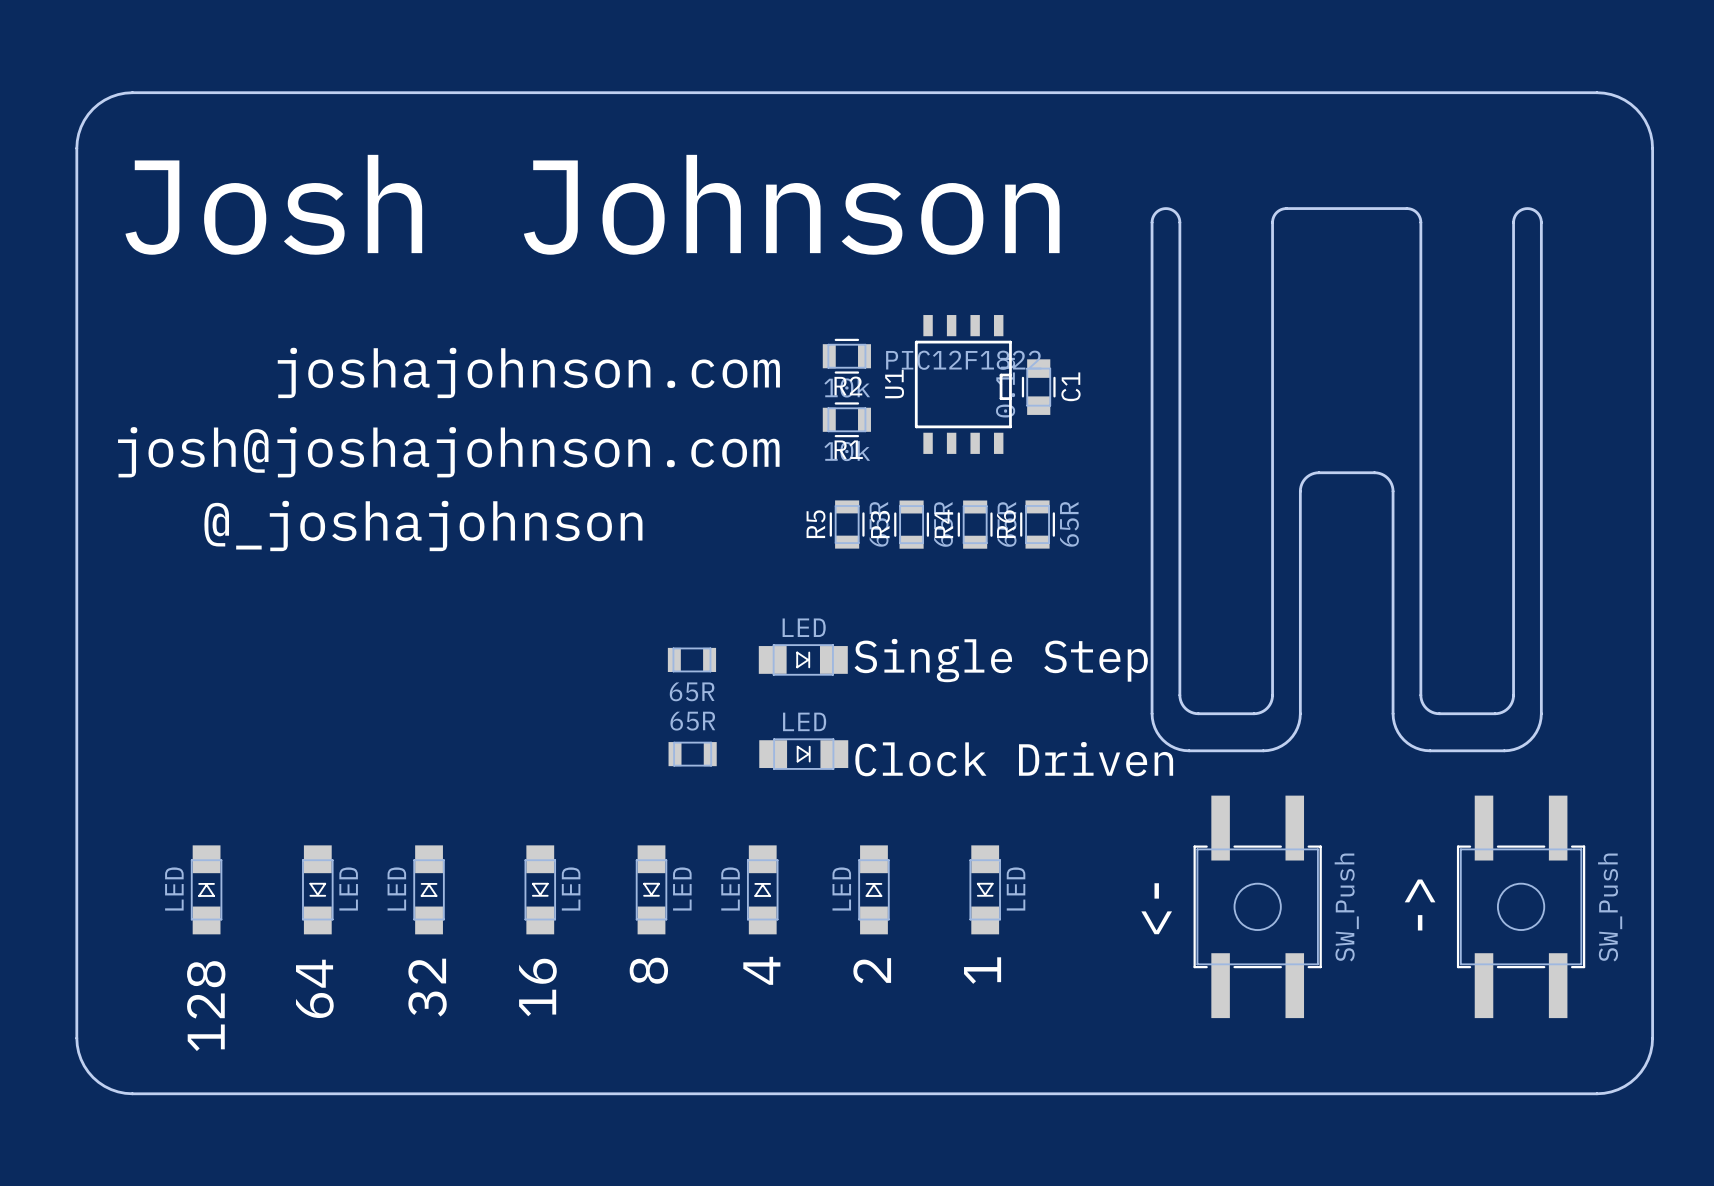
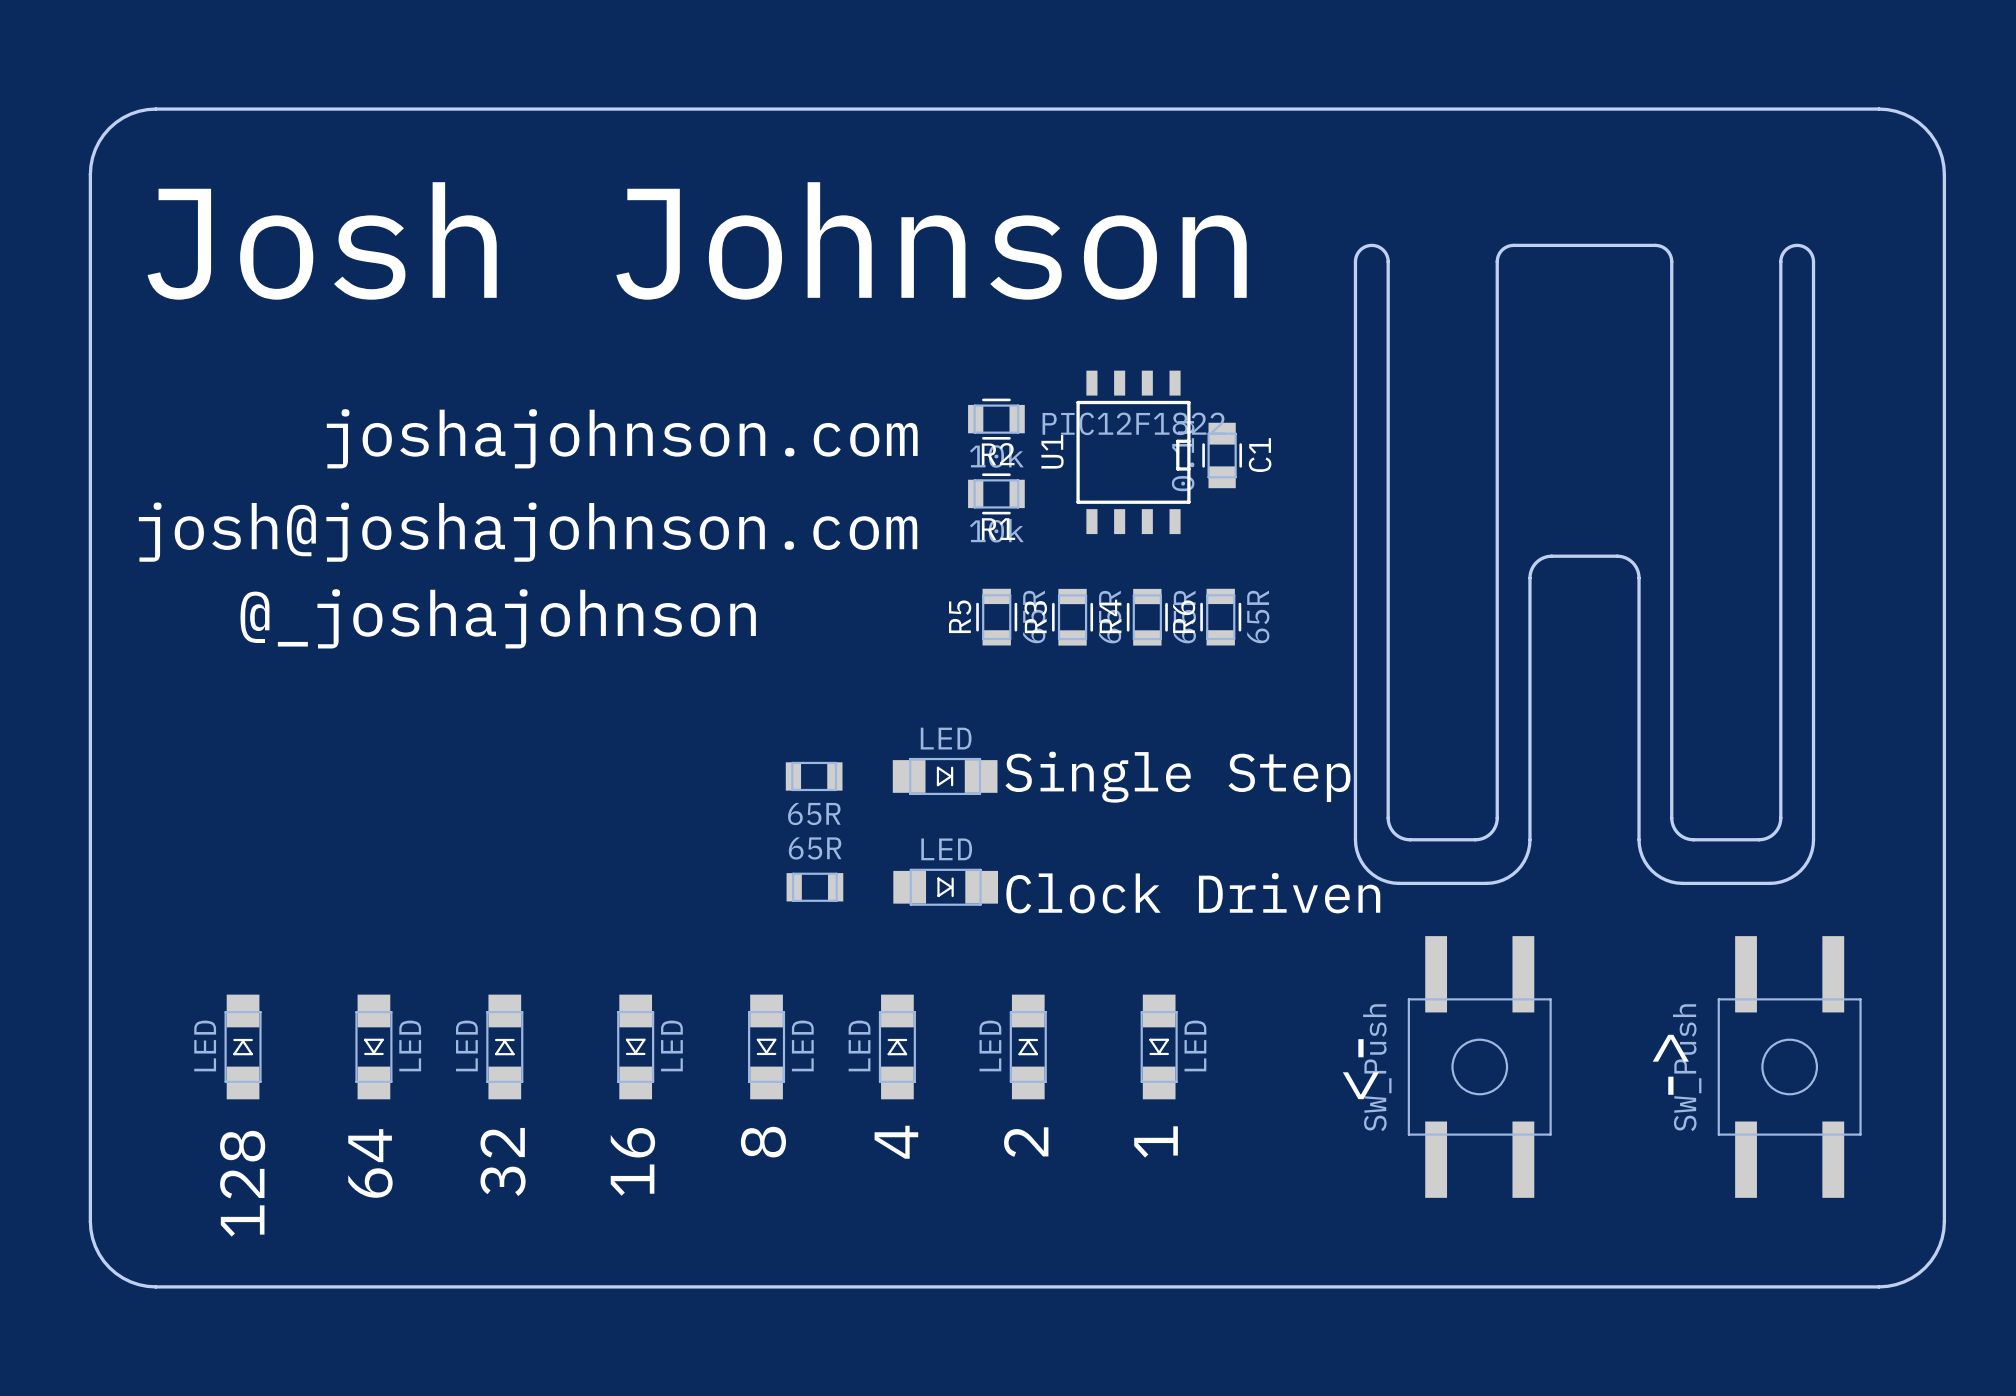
part footprint: [1193, 795, 1322, 1019] -> [1407, 936, 1552, 1198]
part footprint: [1456, 795, 1586, 1019] -> [1717, 936, 1862, 1198]
part value position: SW_Push (1346, 907) -> SW_Push (1377, 1067)
part value position: SW_Push (1610, 907) -> SW_Push (1687, 1067)

